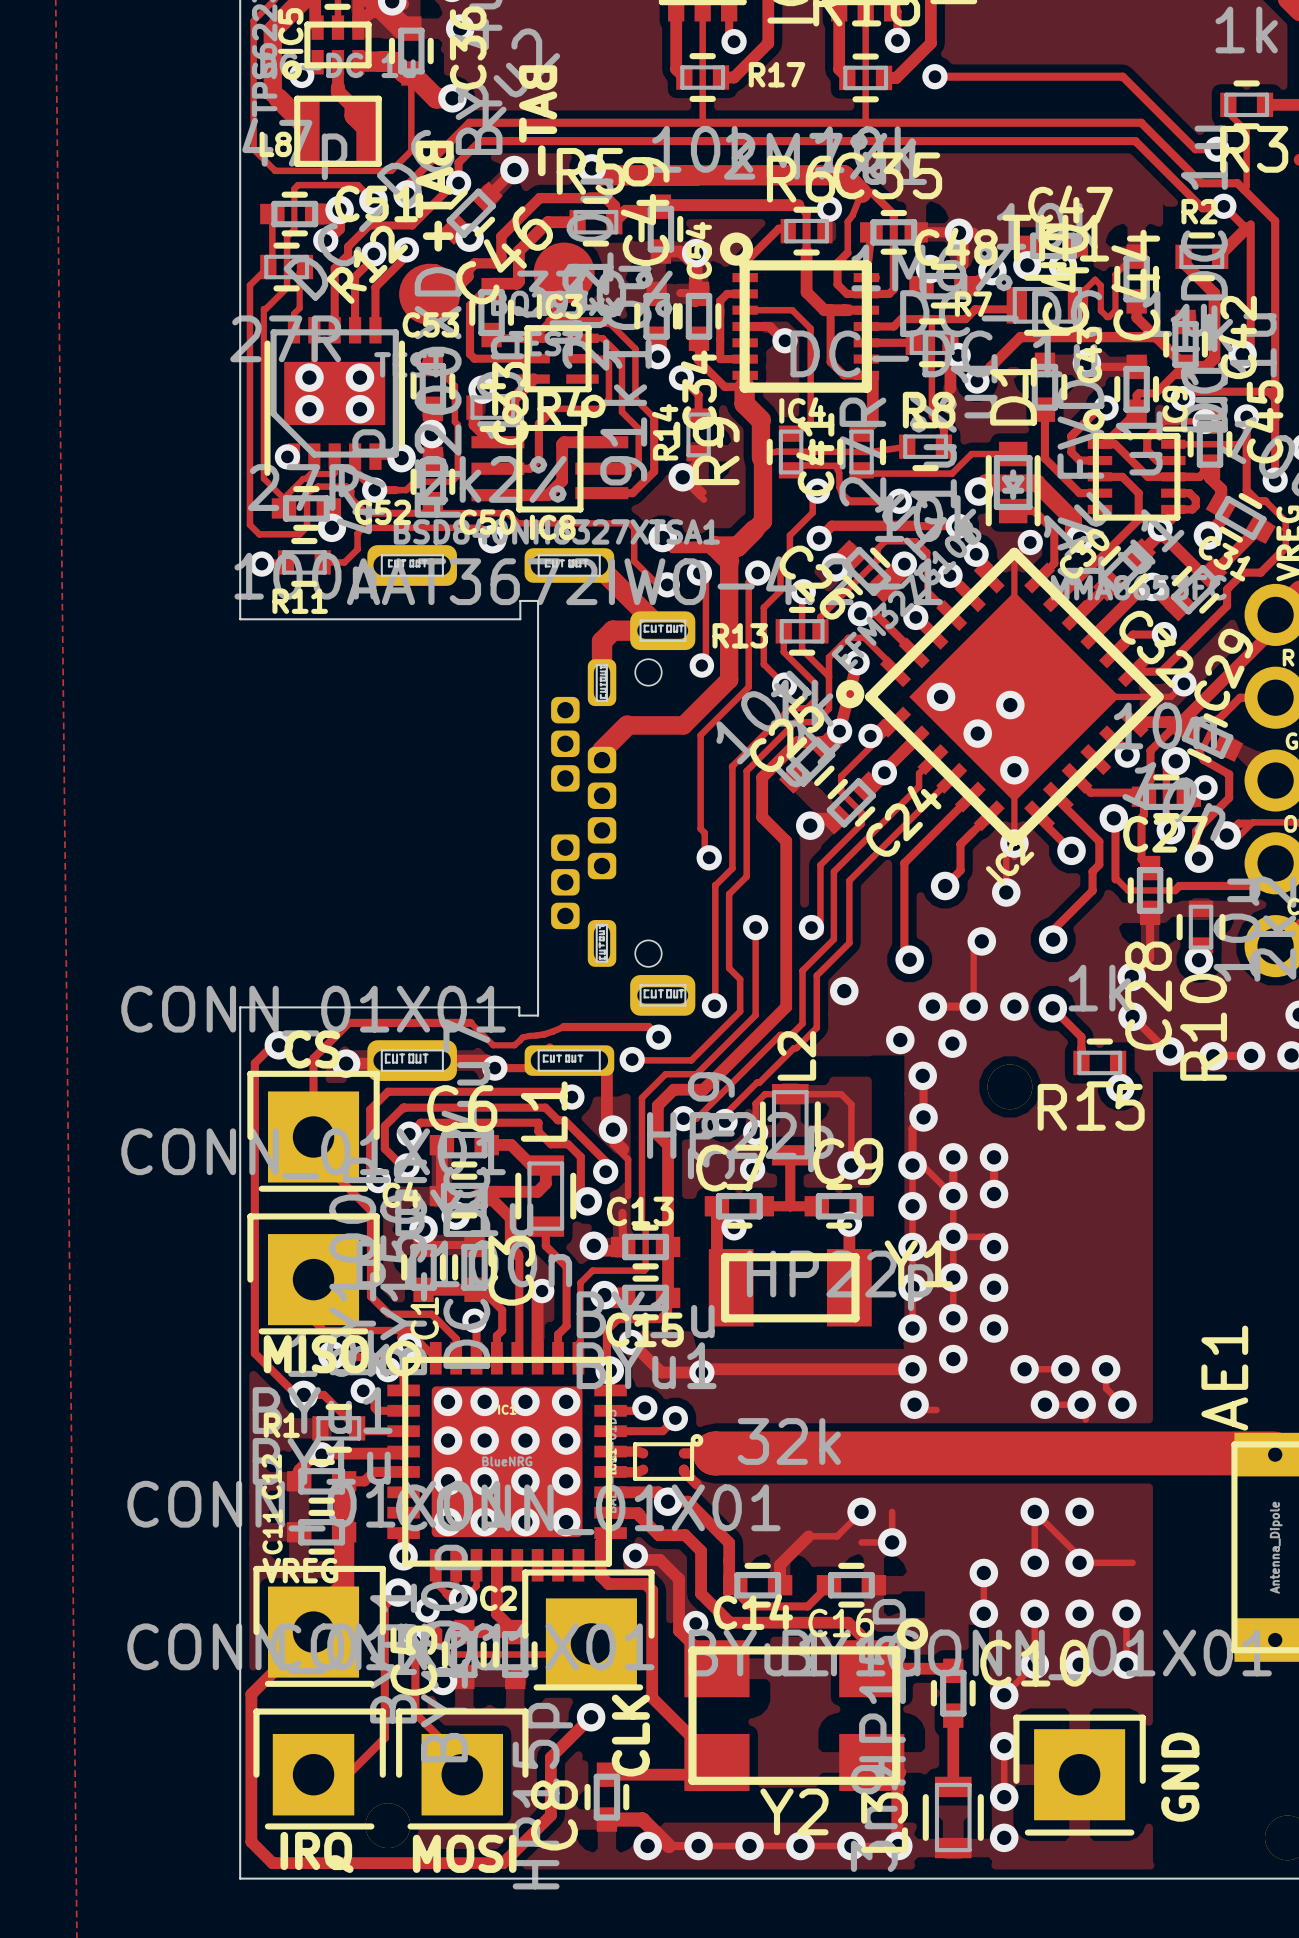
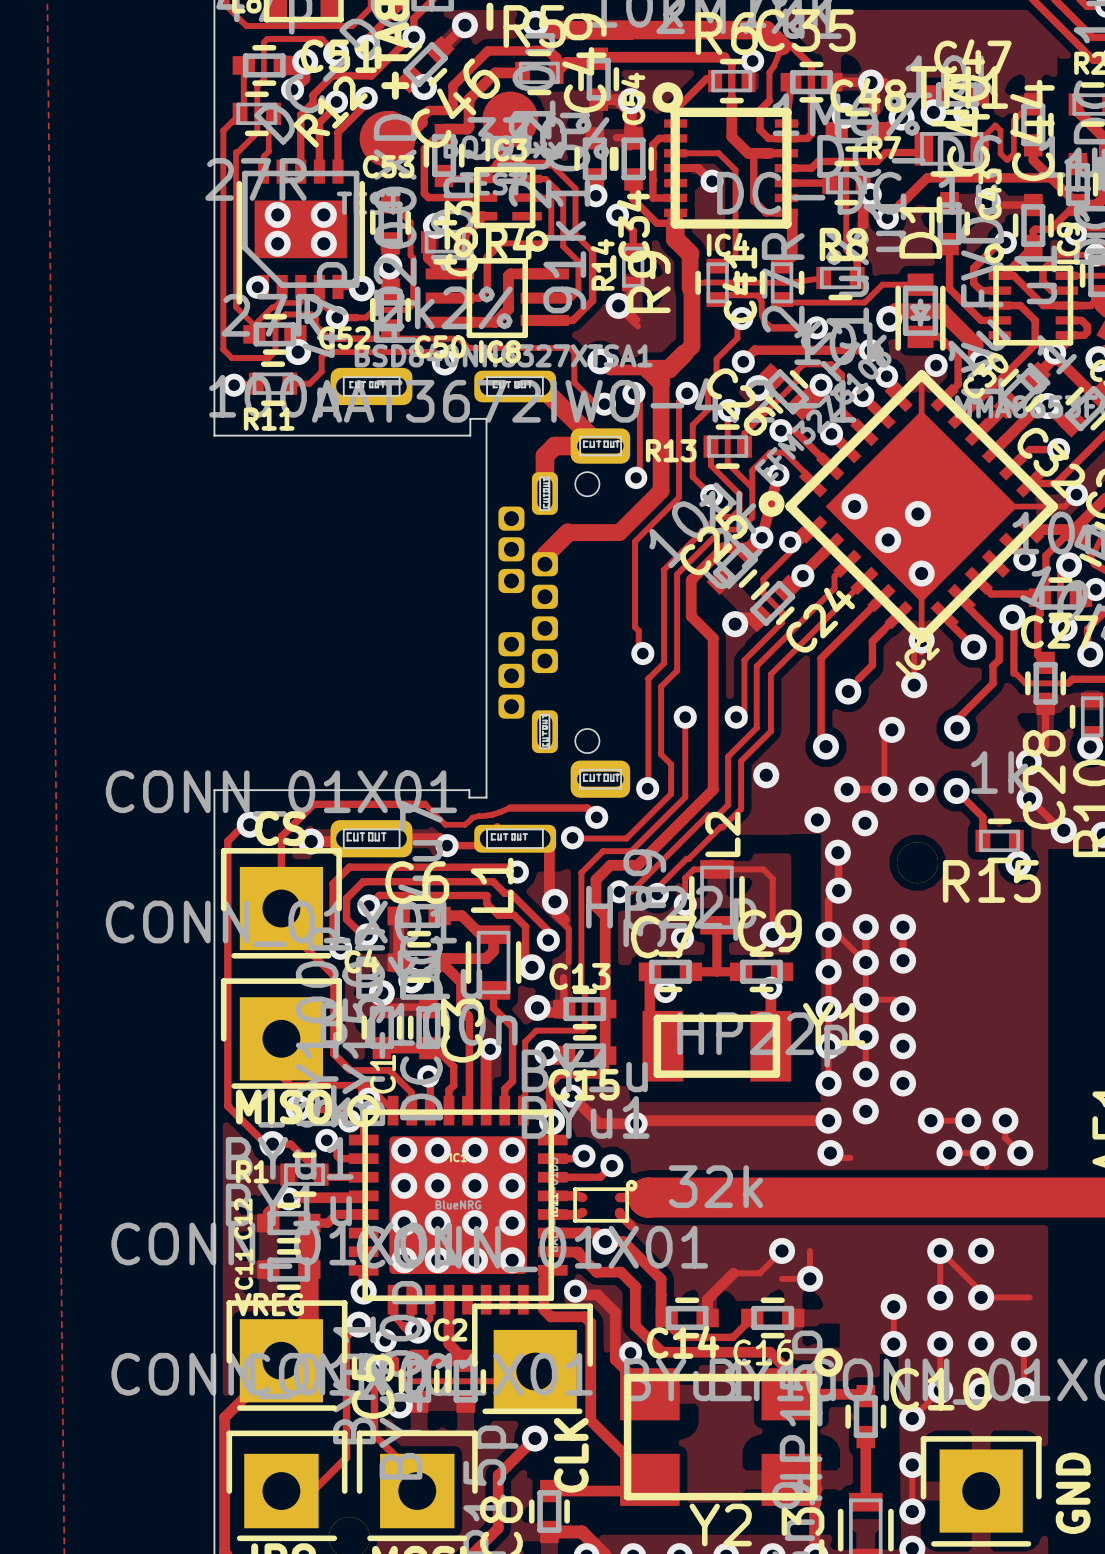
via position: (945, 885) -> (848, 691)

